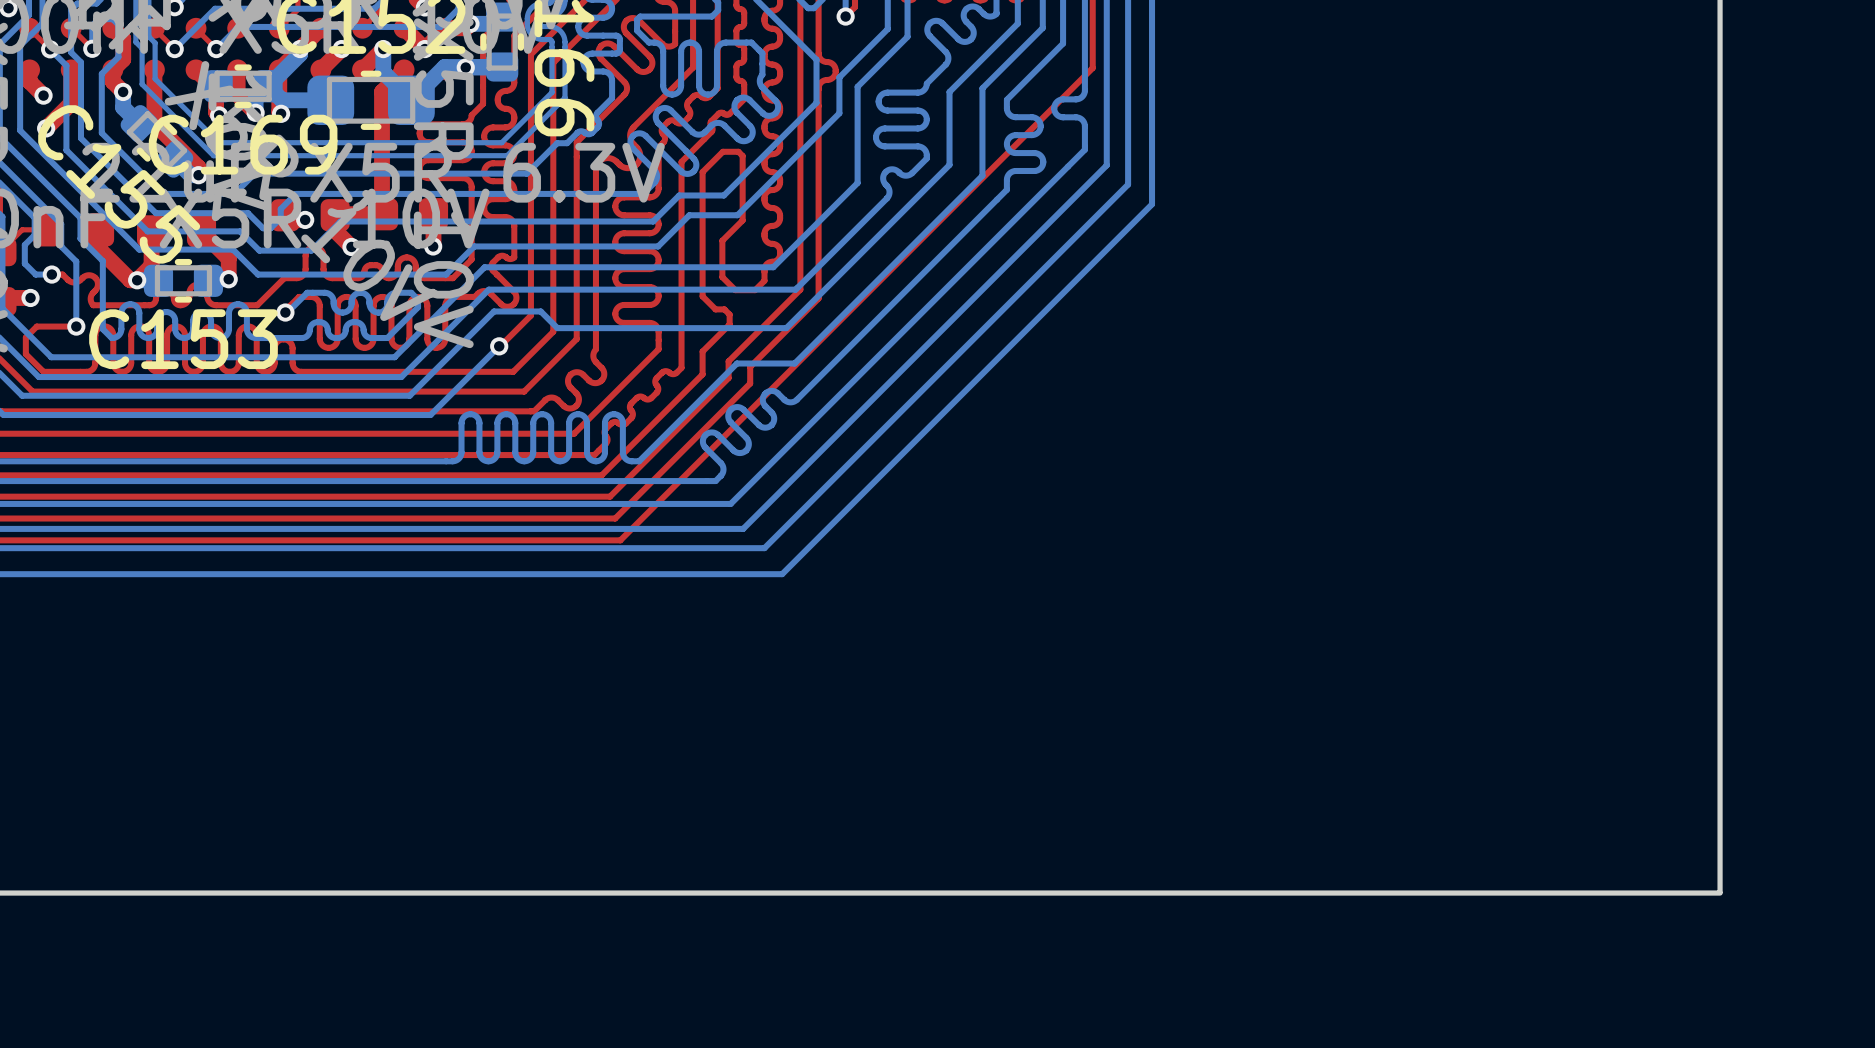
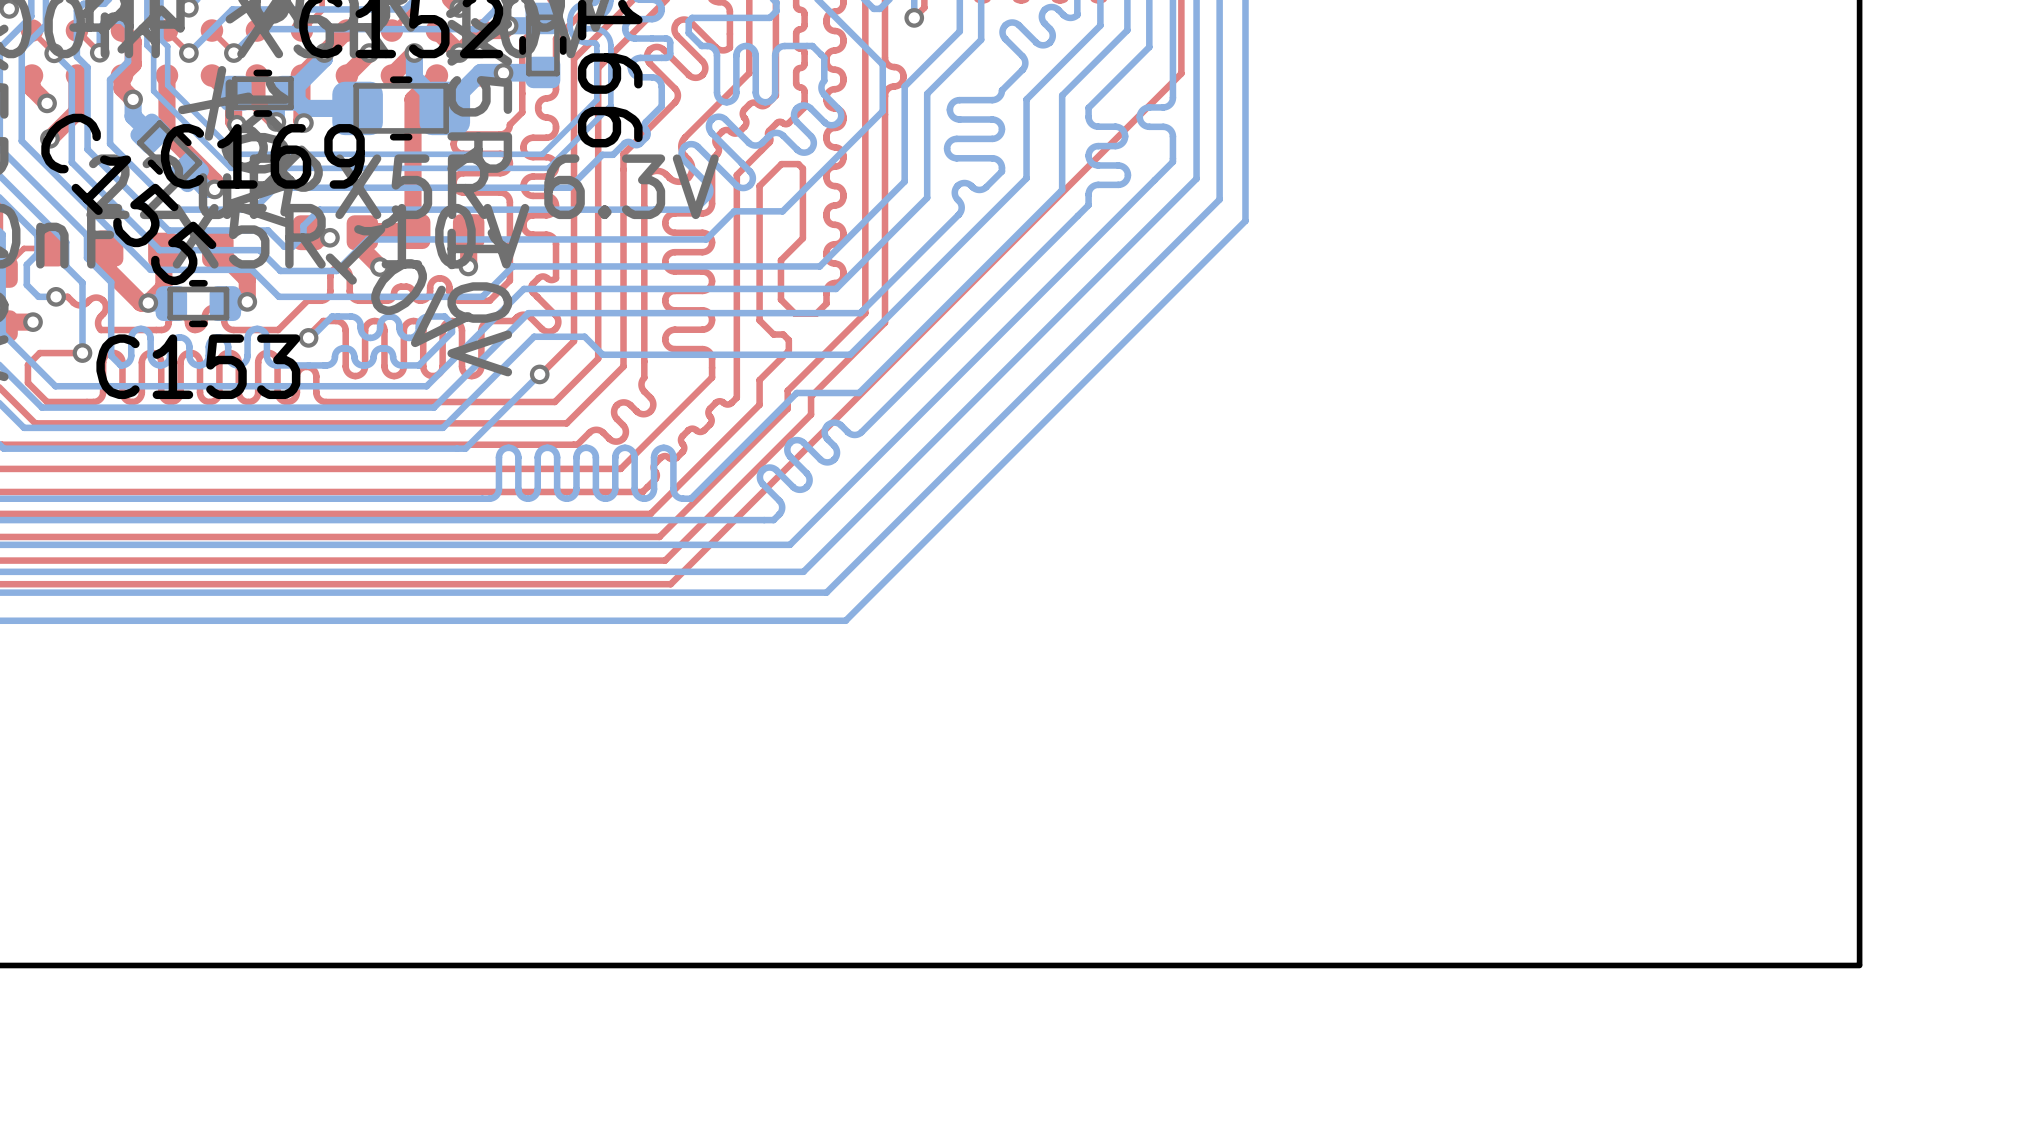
bottom track: (839, 77) (839, 113) (737, 215) (689, 215) (658, 246) -> (907, 83) (904, 86) (904, 181) (819, 266) (711, 266)

